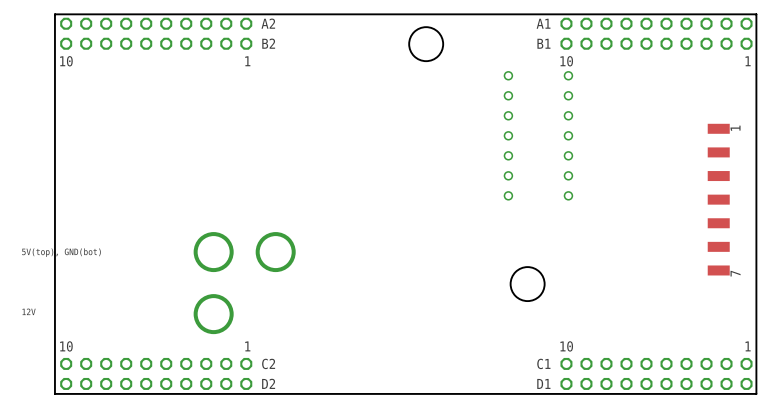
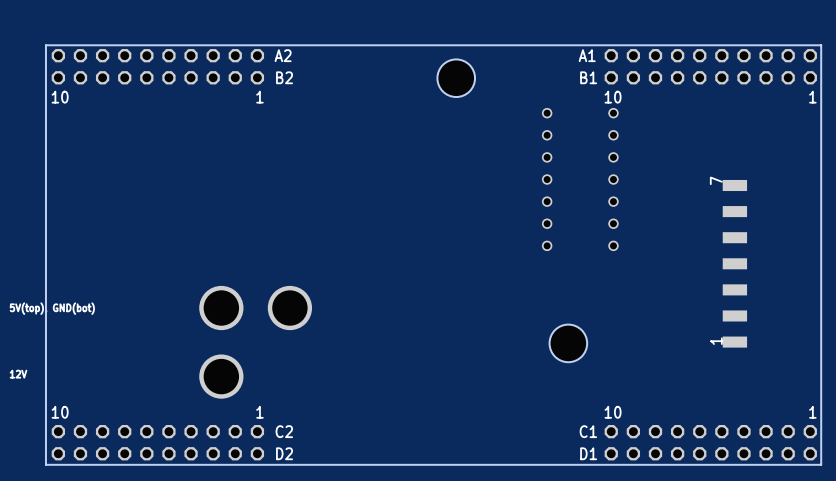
part: (718, 199) -> none
part: none -> (734, 263)

